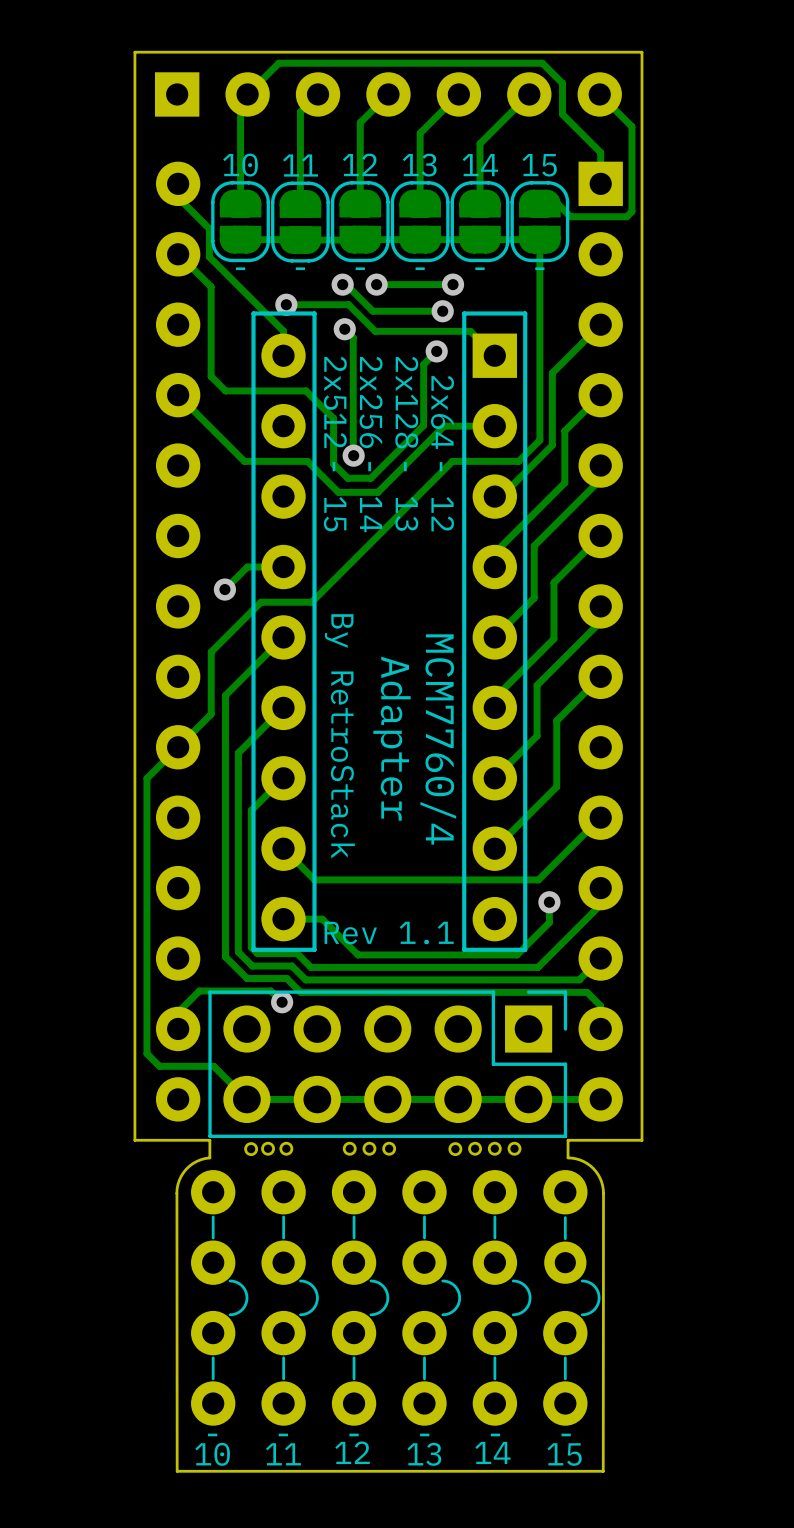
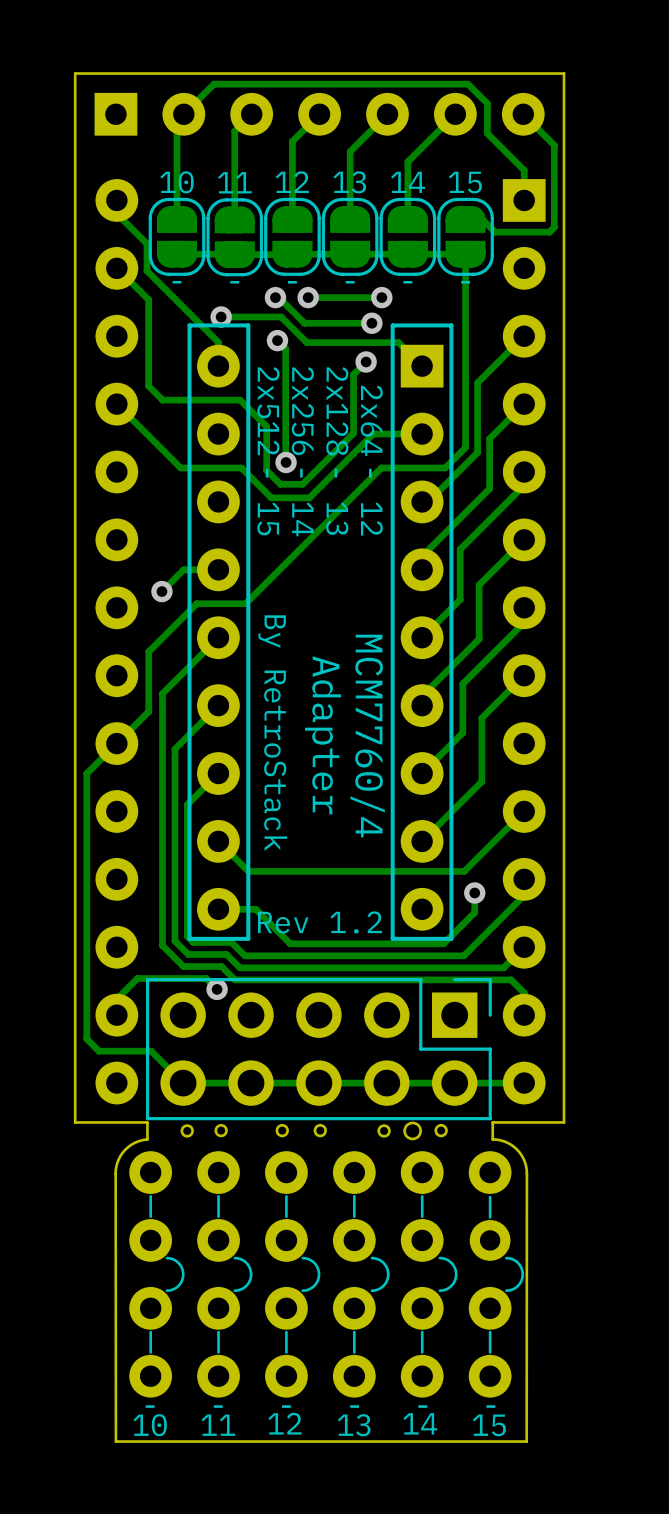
text: Rev 1.1 (389, 933) -> Rev 1.2 (320, 922)
round board edge: none -> [403, 1121, 423, 1141]
round board edge: [261, 1141, 275, 1156] -> none
round board edge: [362, 1141, 377, 1156] -> none
round board edge: [468, 1141, 483, 1156] -> none
round board edge: [487, 1141, 502, 1156] -> none

